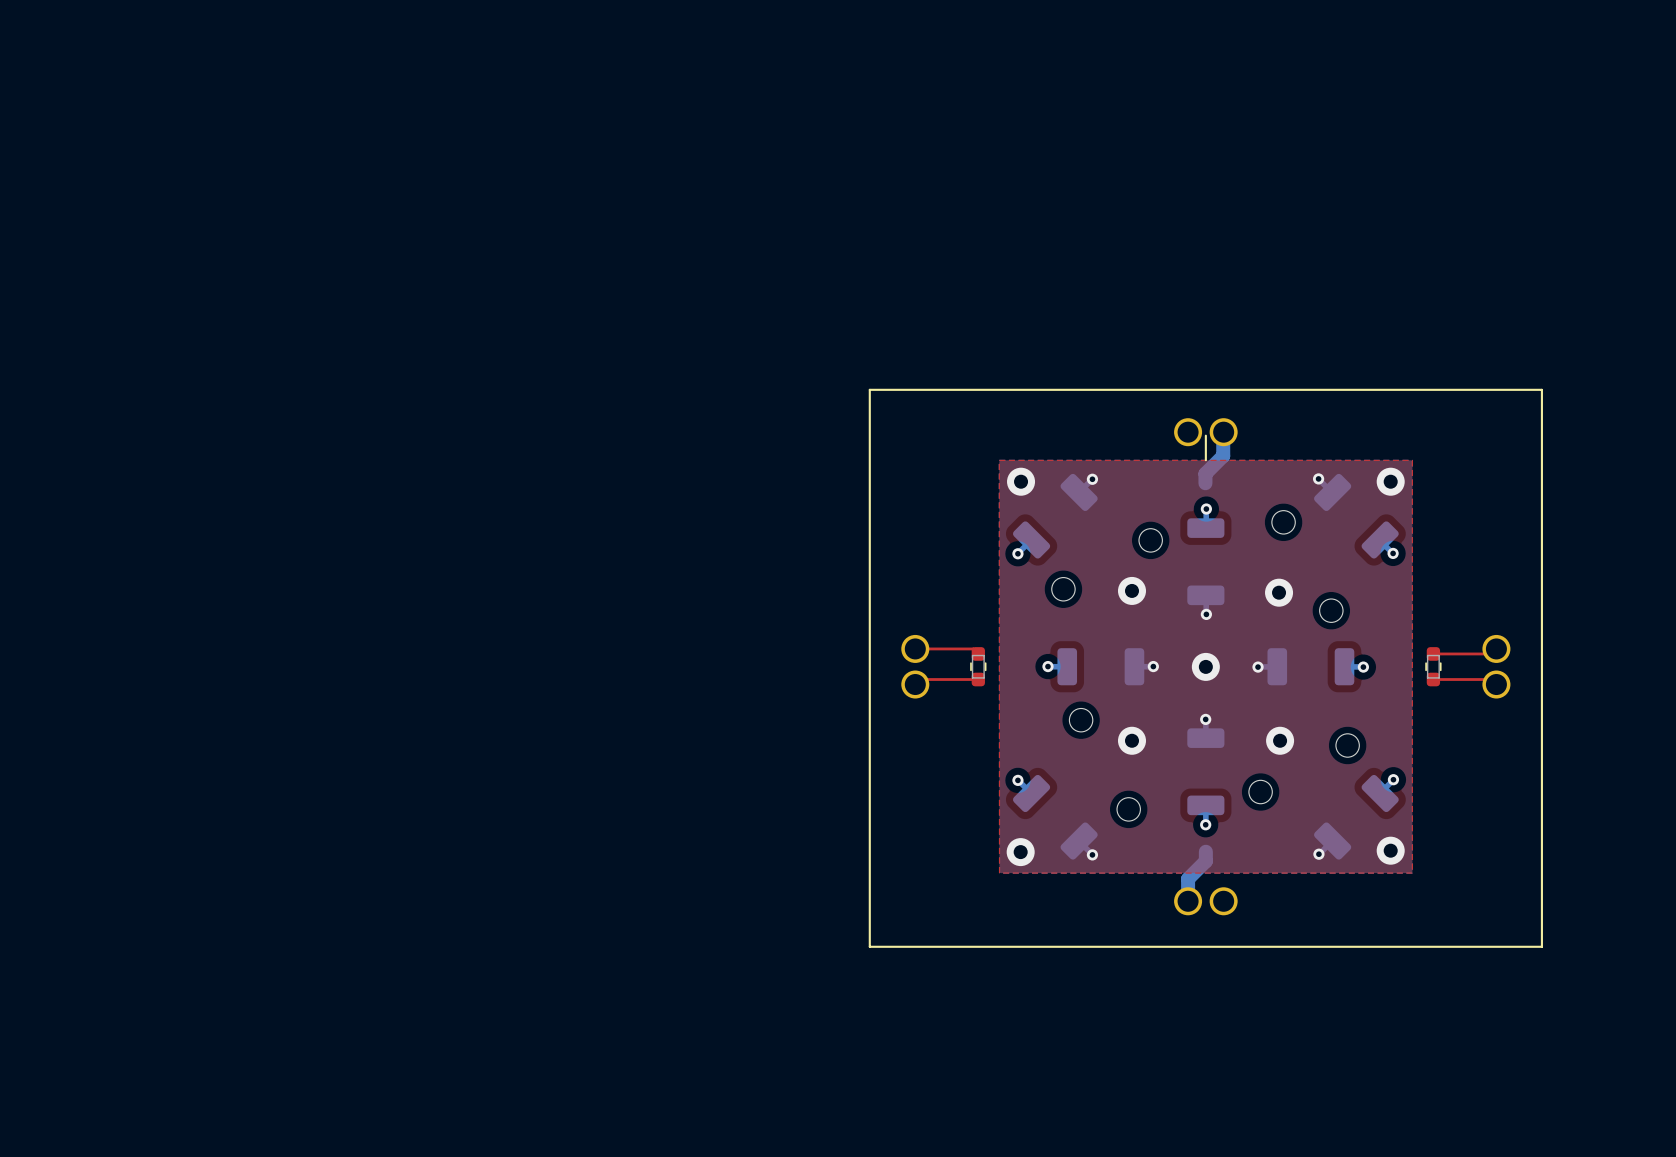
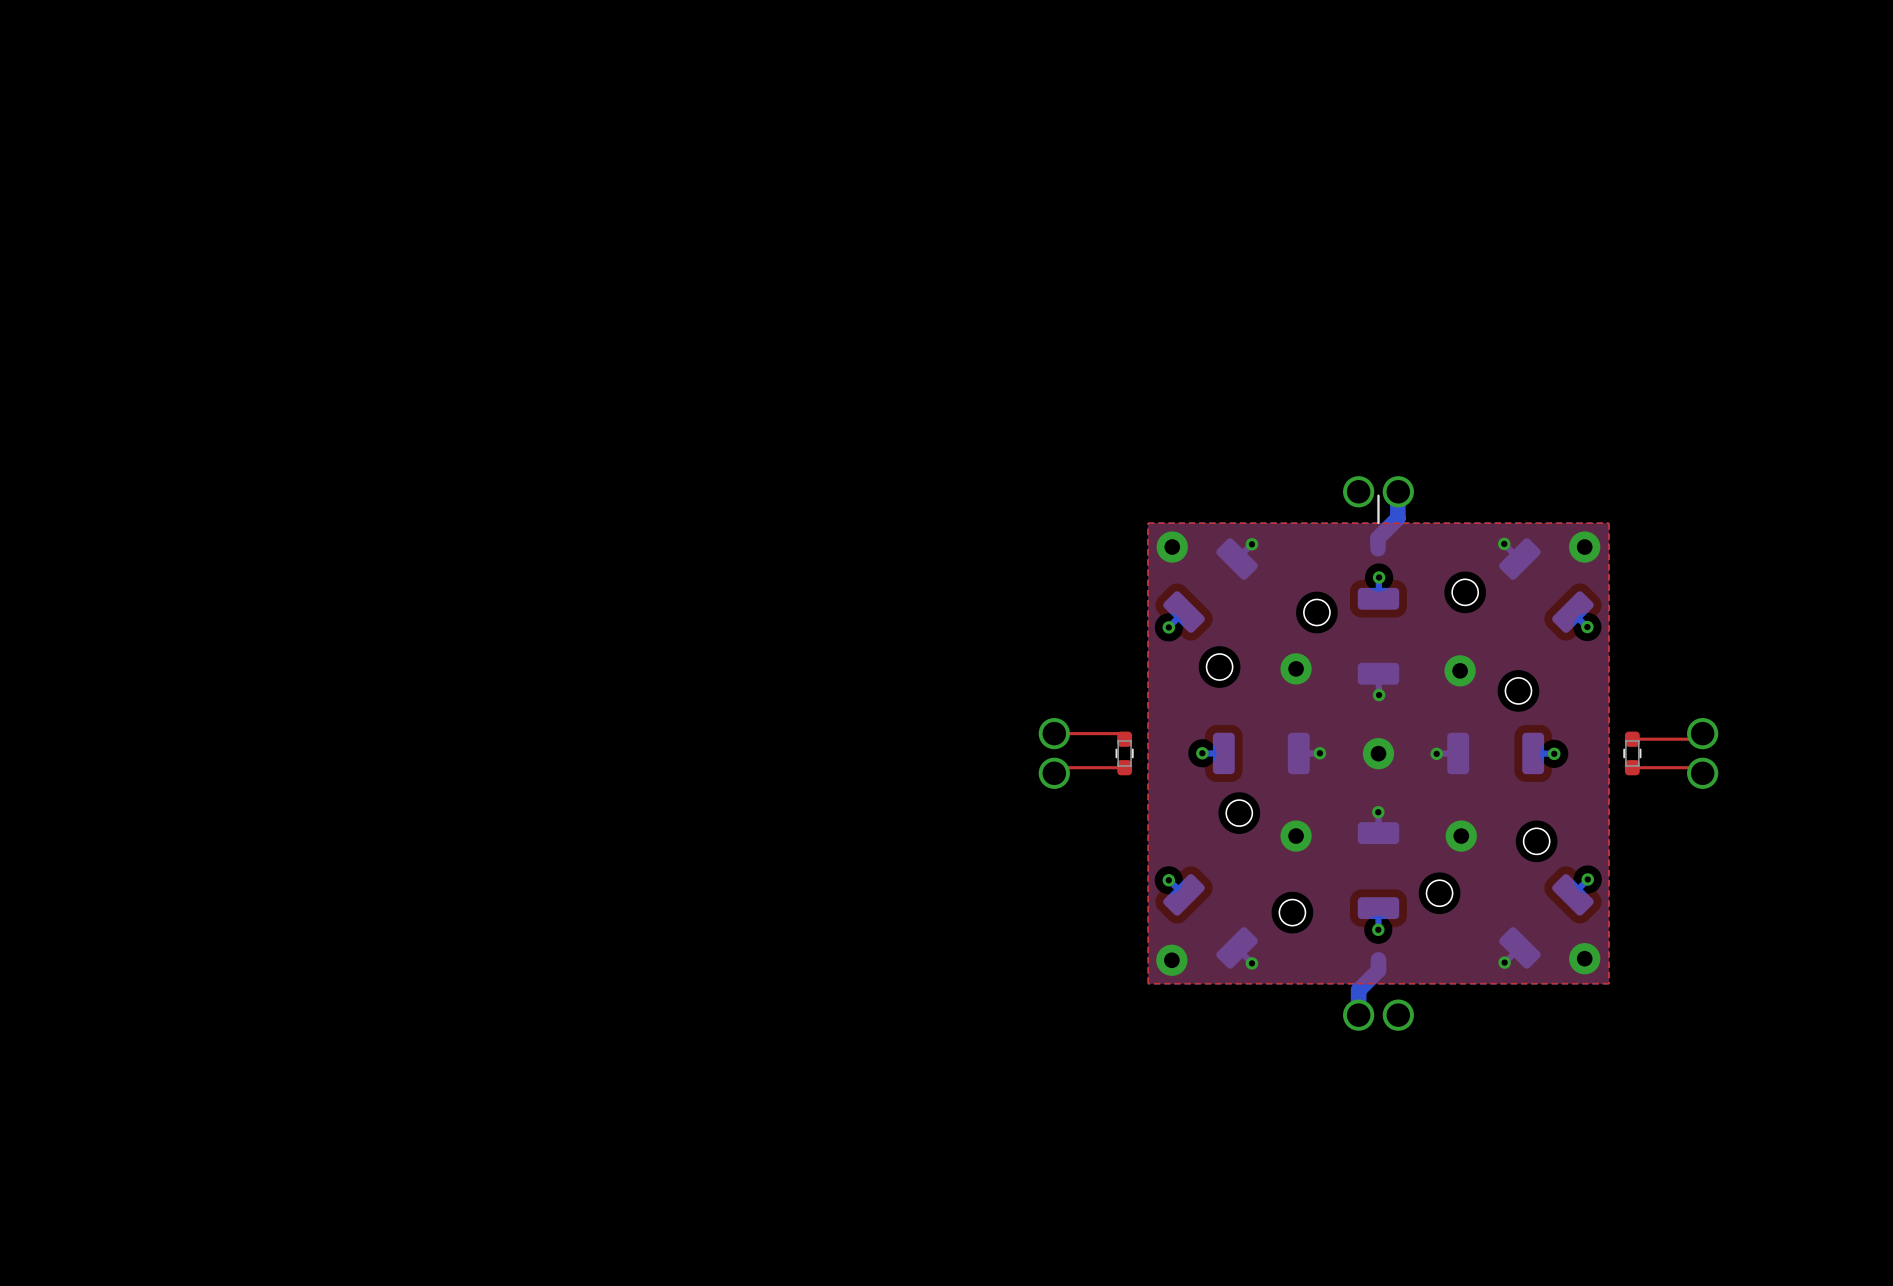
line: (869, 389) (1541, 389) (1541, 946) (869, 946) (869, 389) -> none

